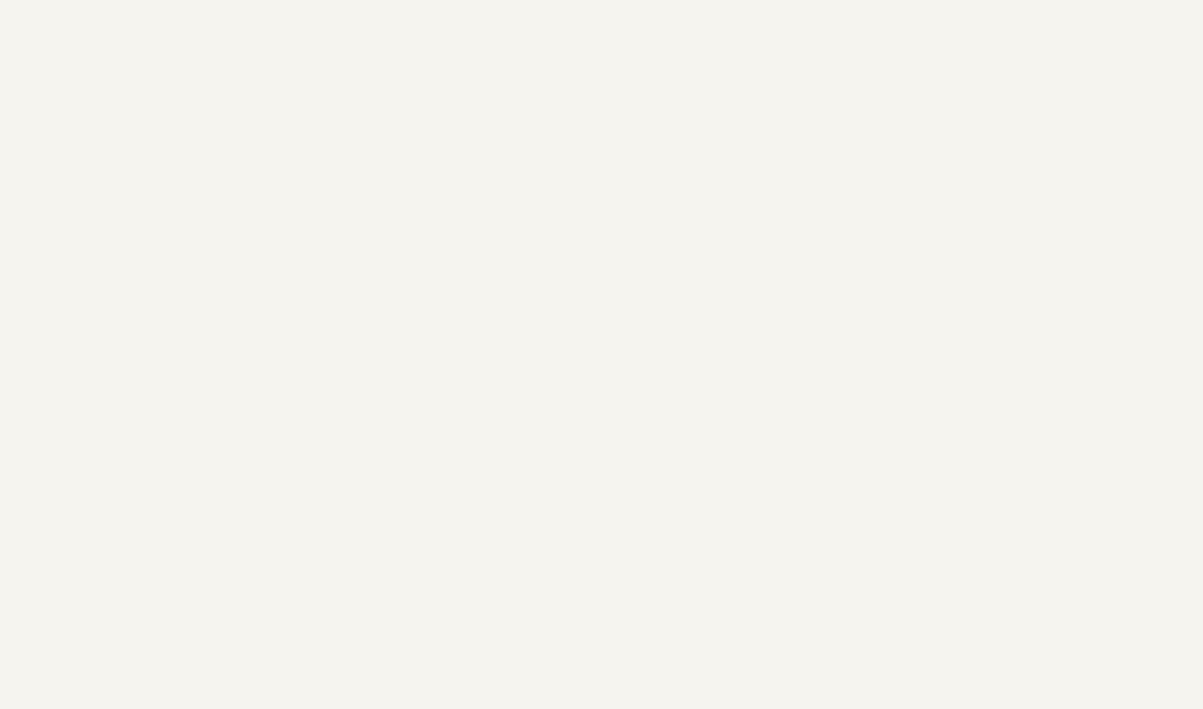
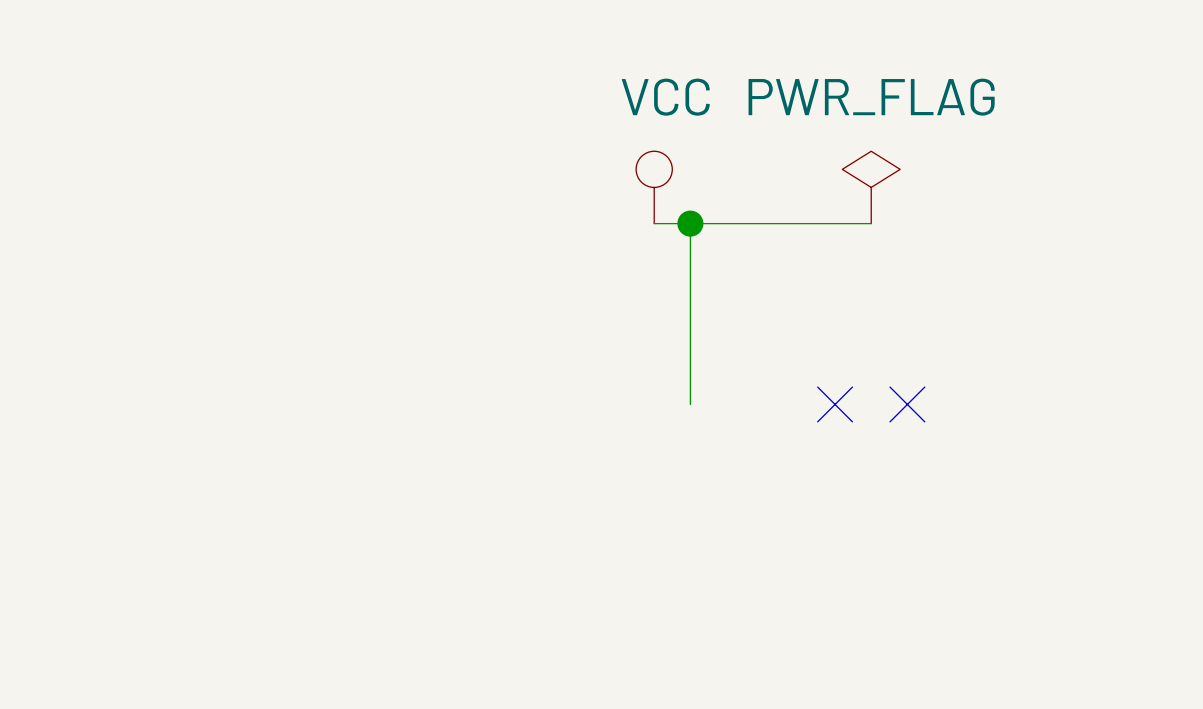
power symbol: none -> VCC (654, 187)
power symbol: none -> PWR_FLAG (871, 187)
wire: none -> (654, 223) (871, 223)
wire: none -> (690, 223) (690, 404)
junction: none -> (690, 223)
no-connect mark: none -> (835, 404)
no-connect mark: none -> (907, 404)

